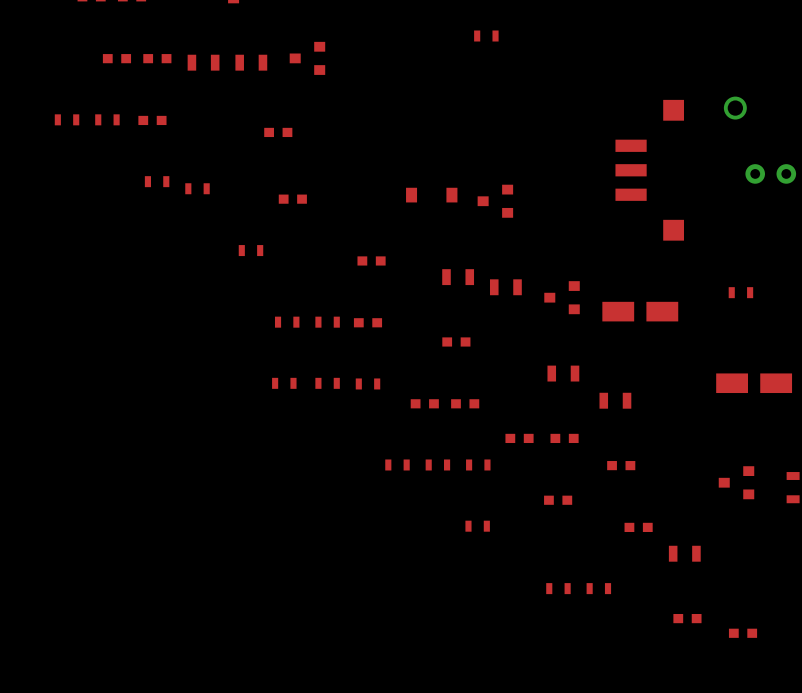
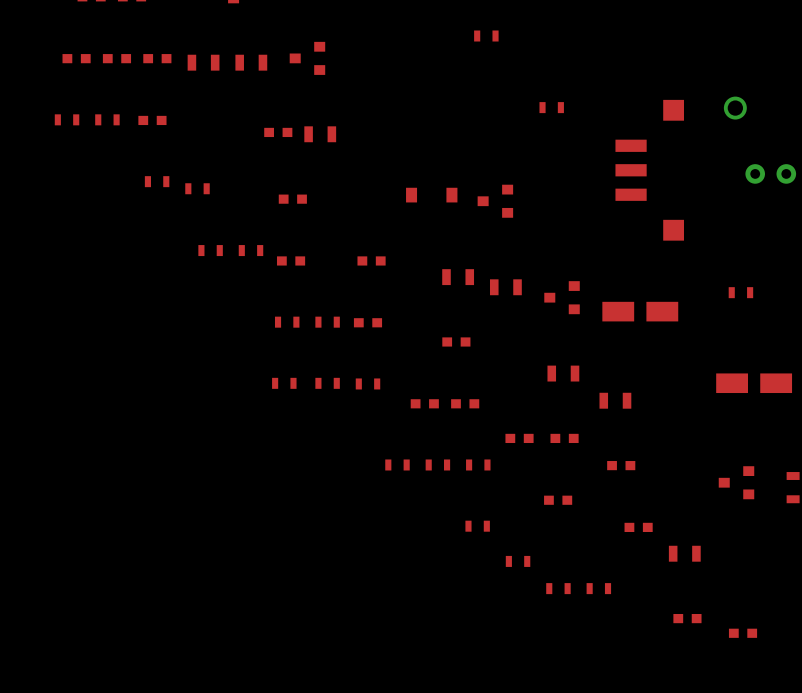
part: none -> (76, 58)
part: none -> (551, 107)
part: none -> (320, 134)
part: none -> (210, 250)
part: none -> (291, 260)
part: none -> (518, 561)

